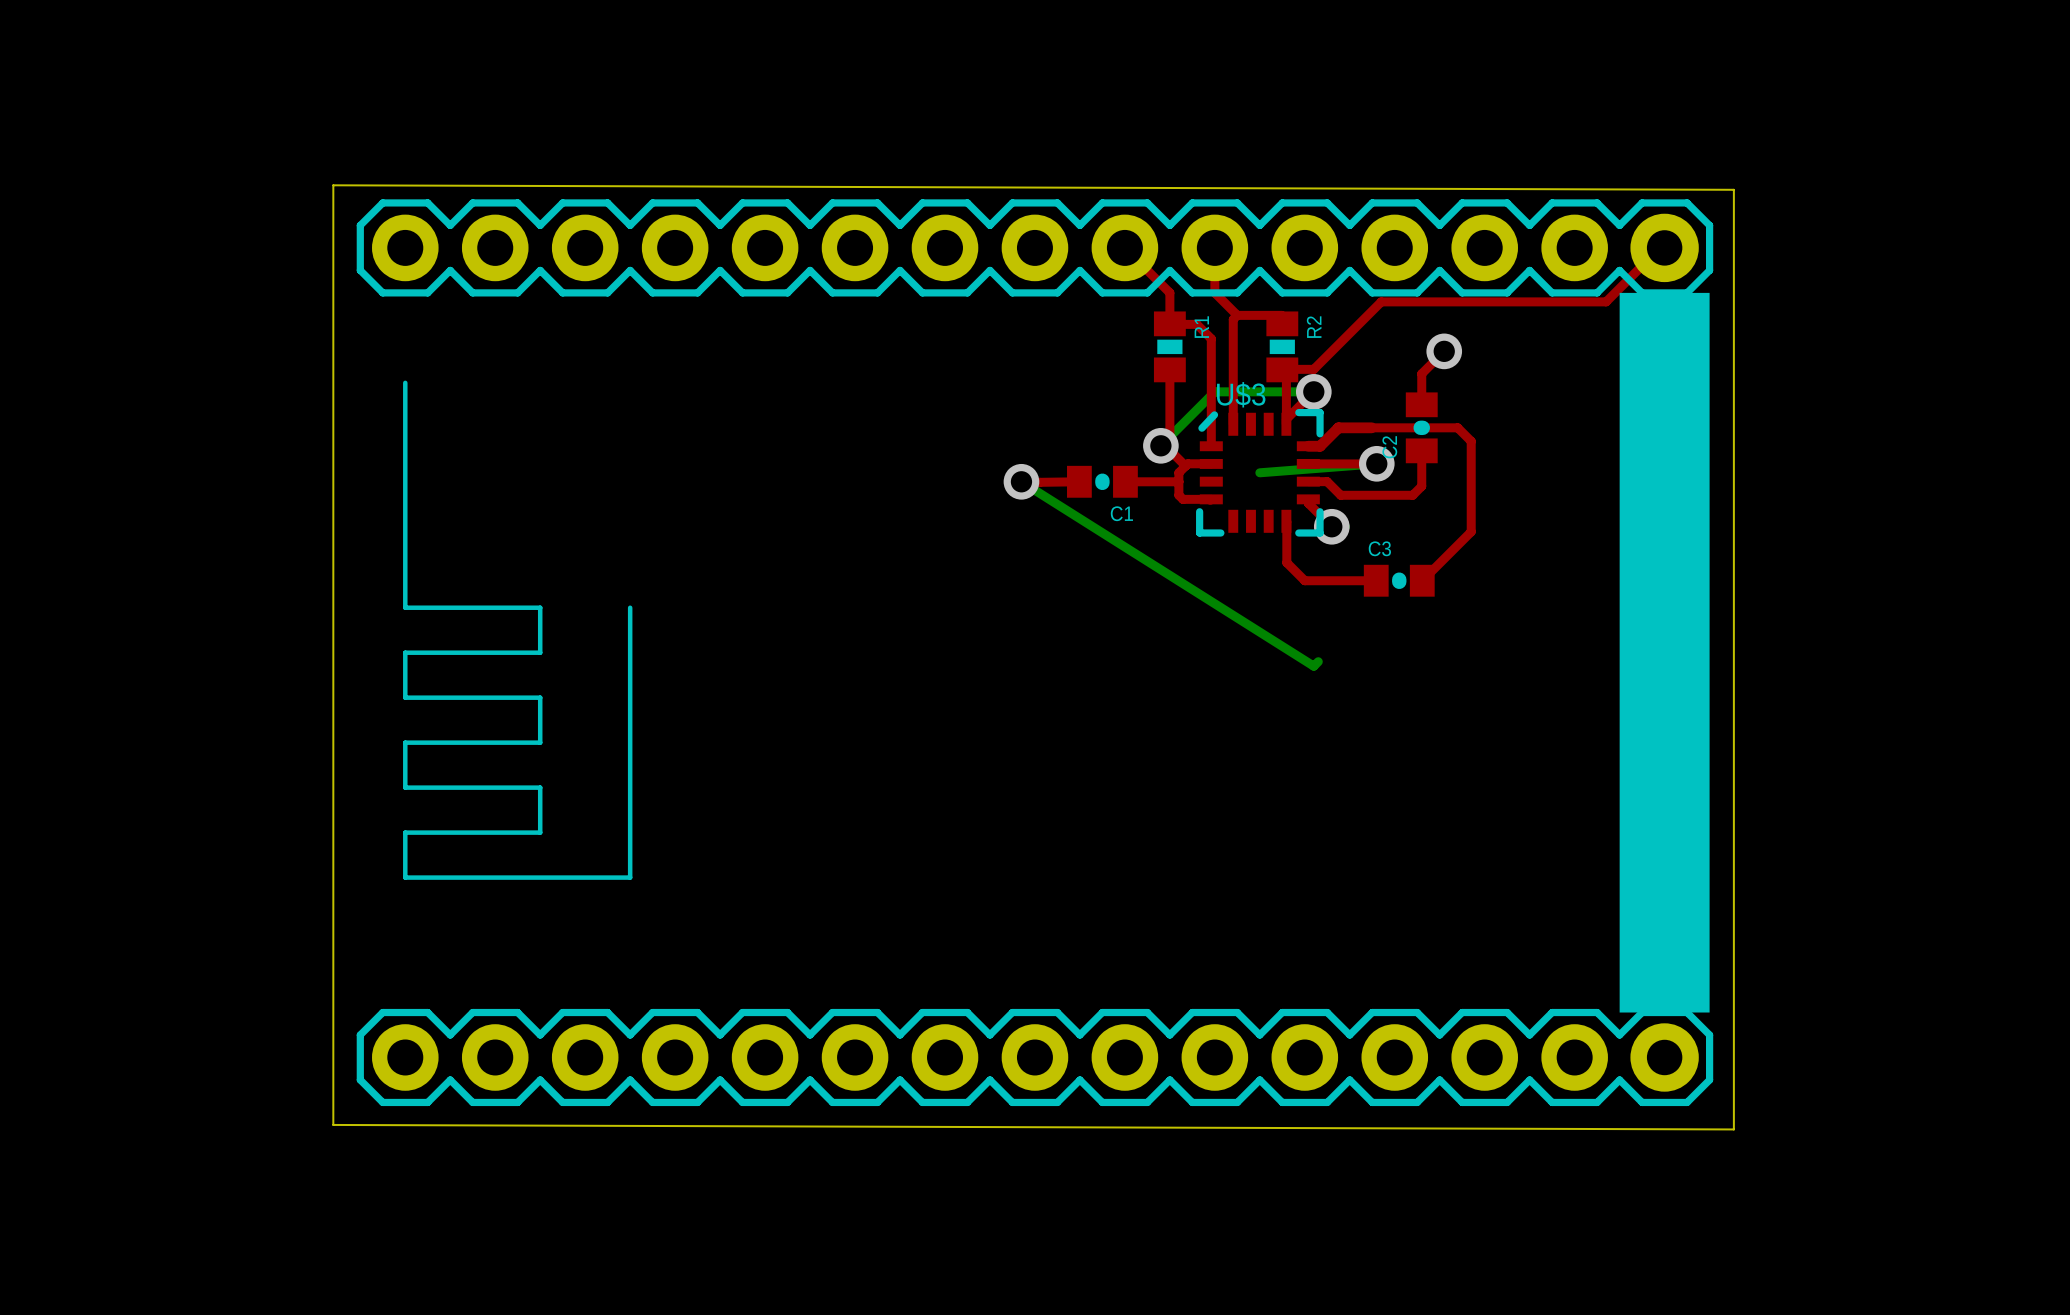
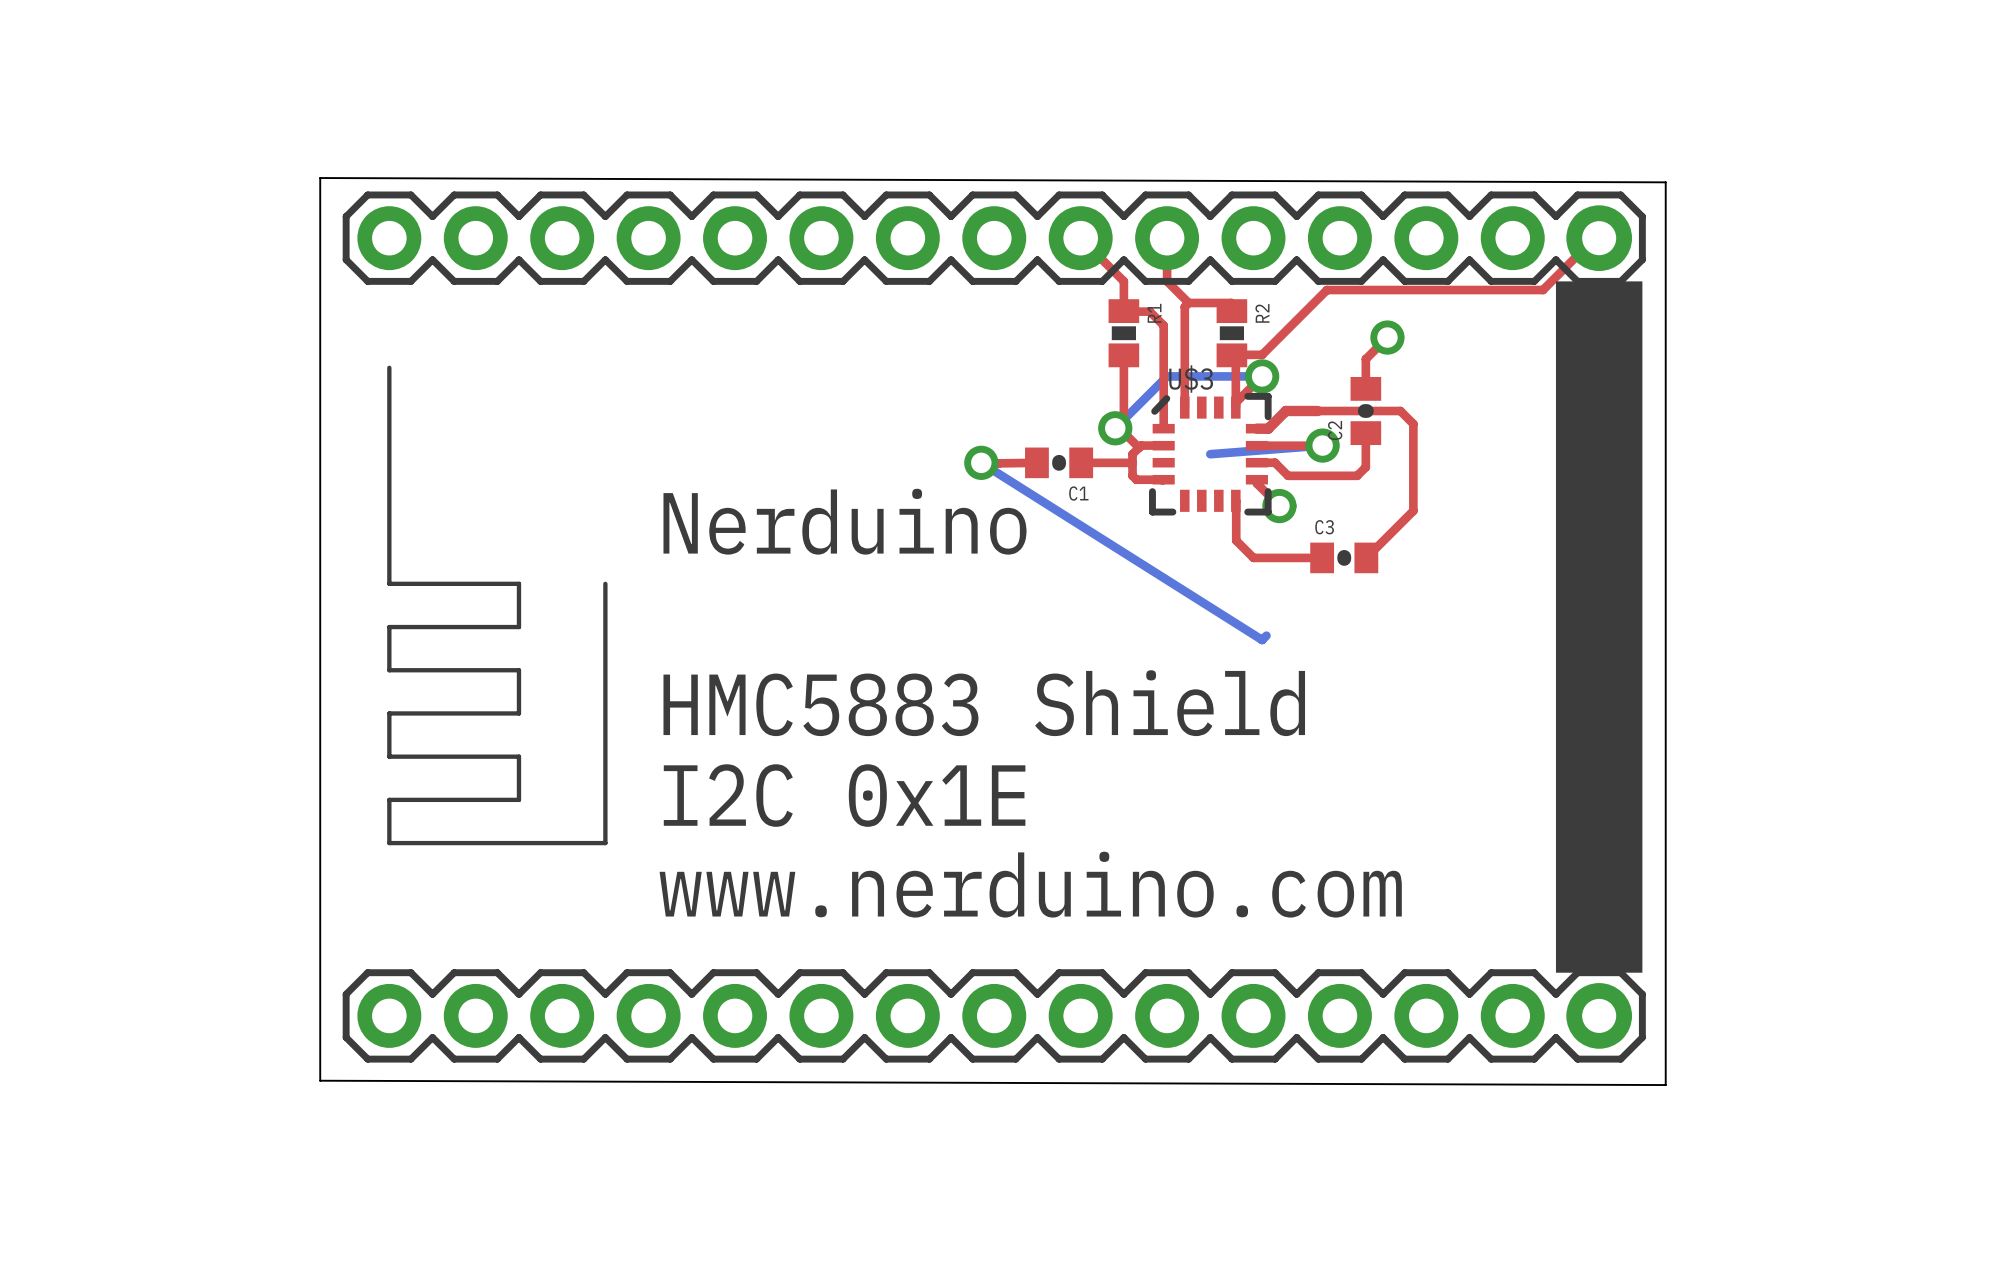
text: none -> Nerduino (844, 521)
text: none -> HMC5883 Shield (984, 703)
text: none -> I2C 0x1E (844, 795)
text: none -> www.nerduino.com (1030, 884)

